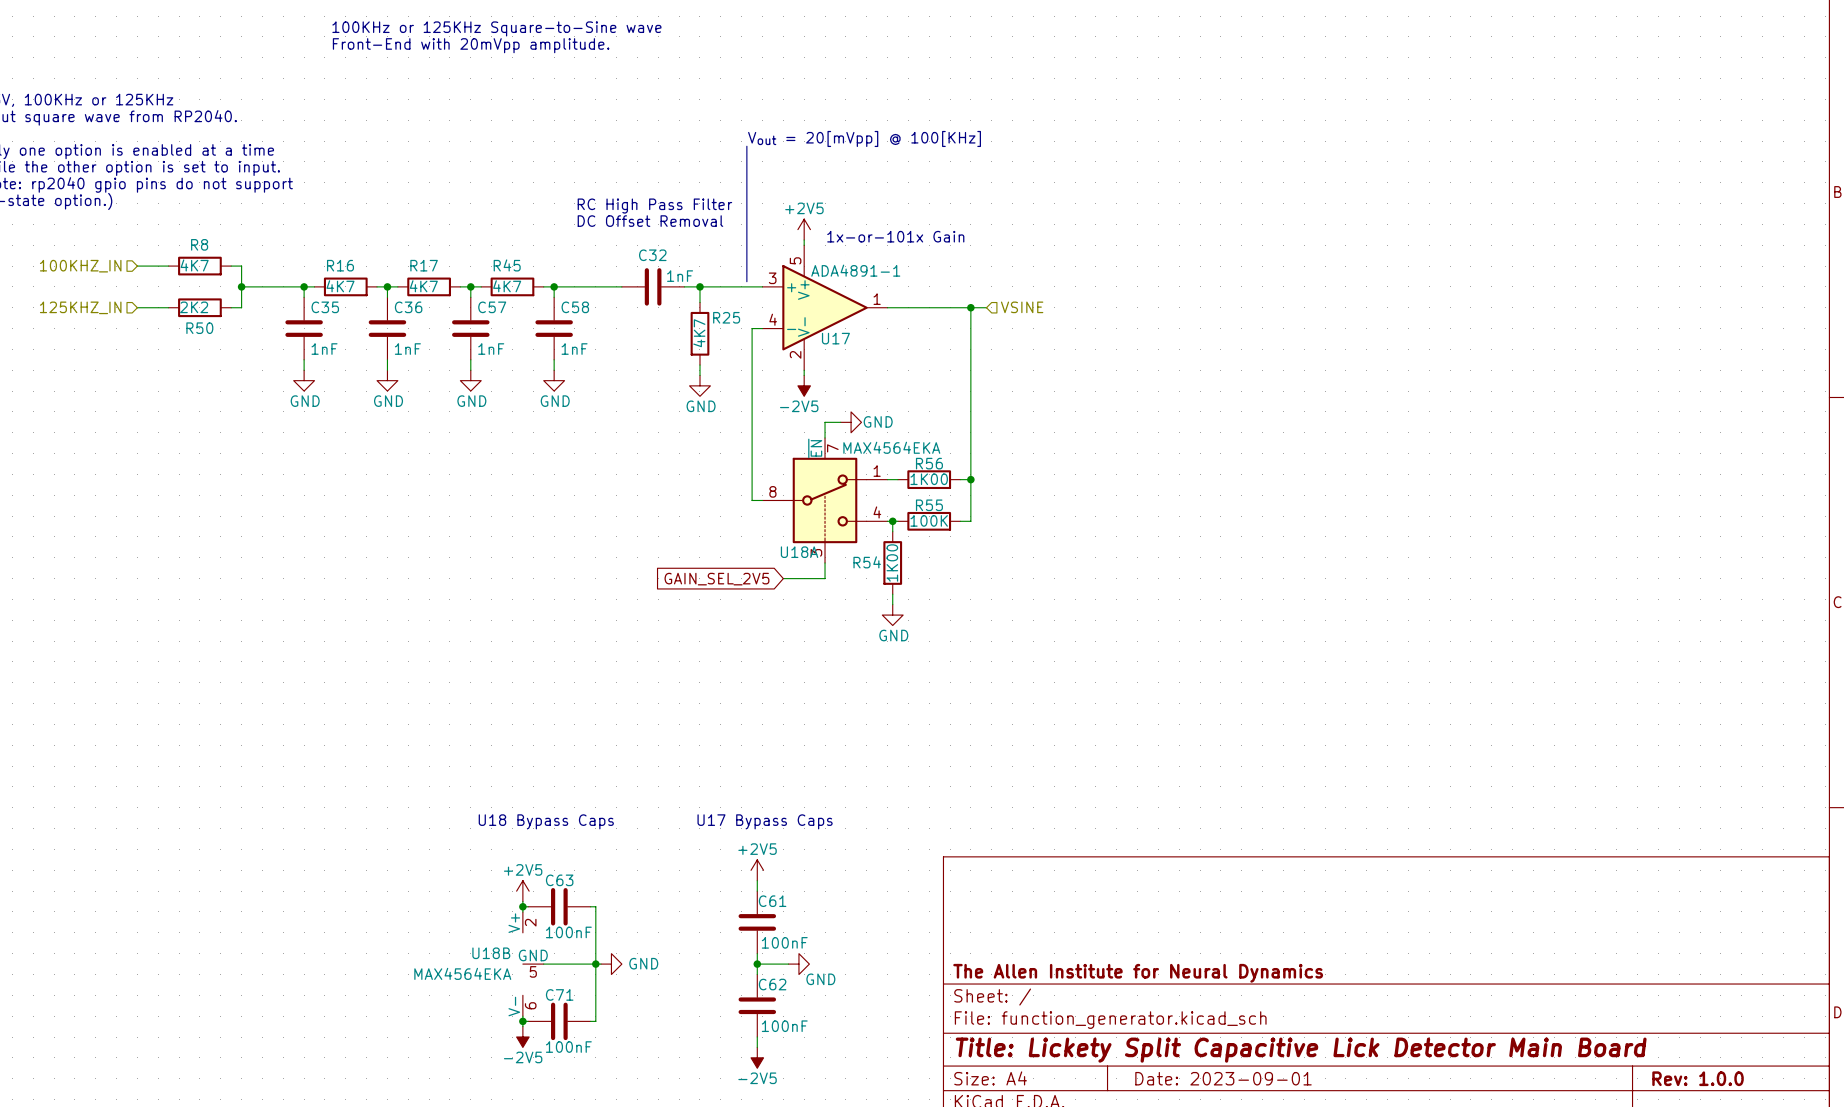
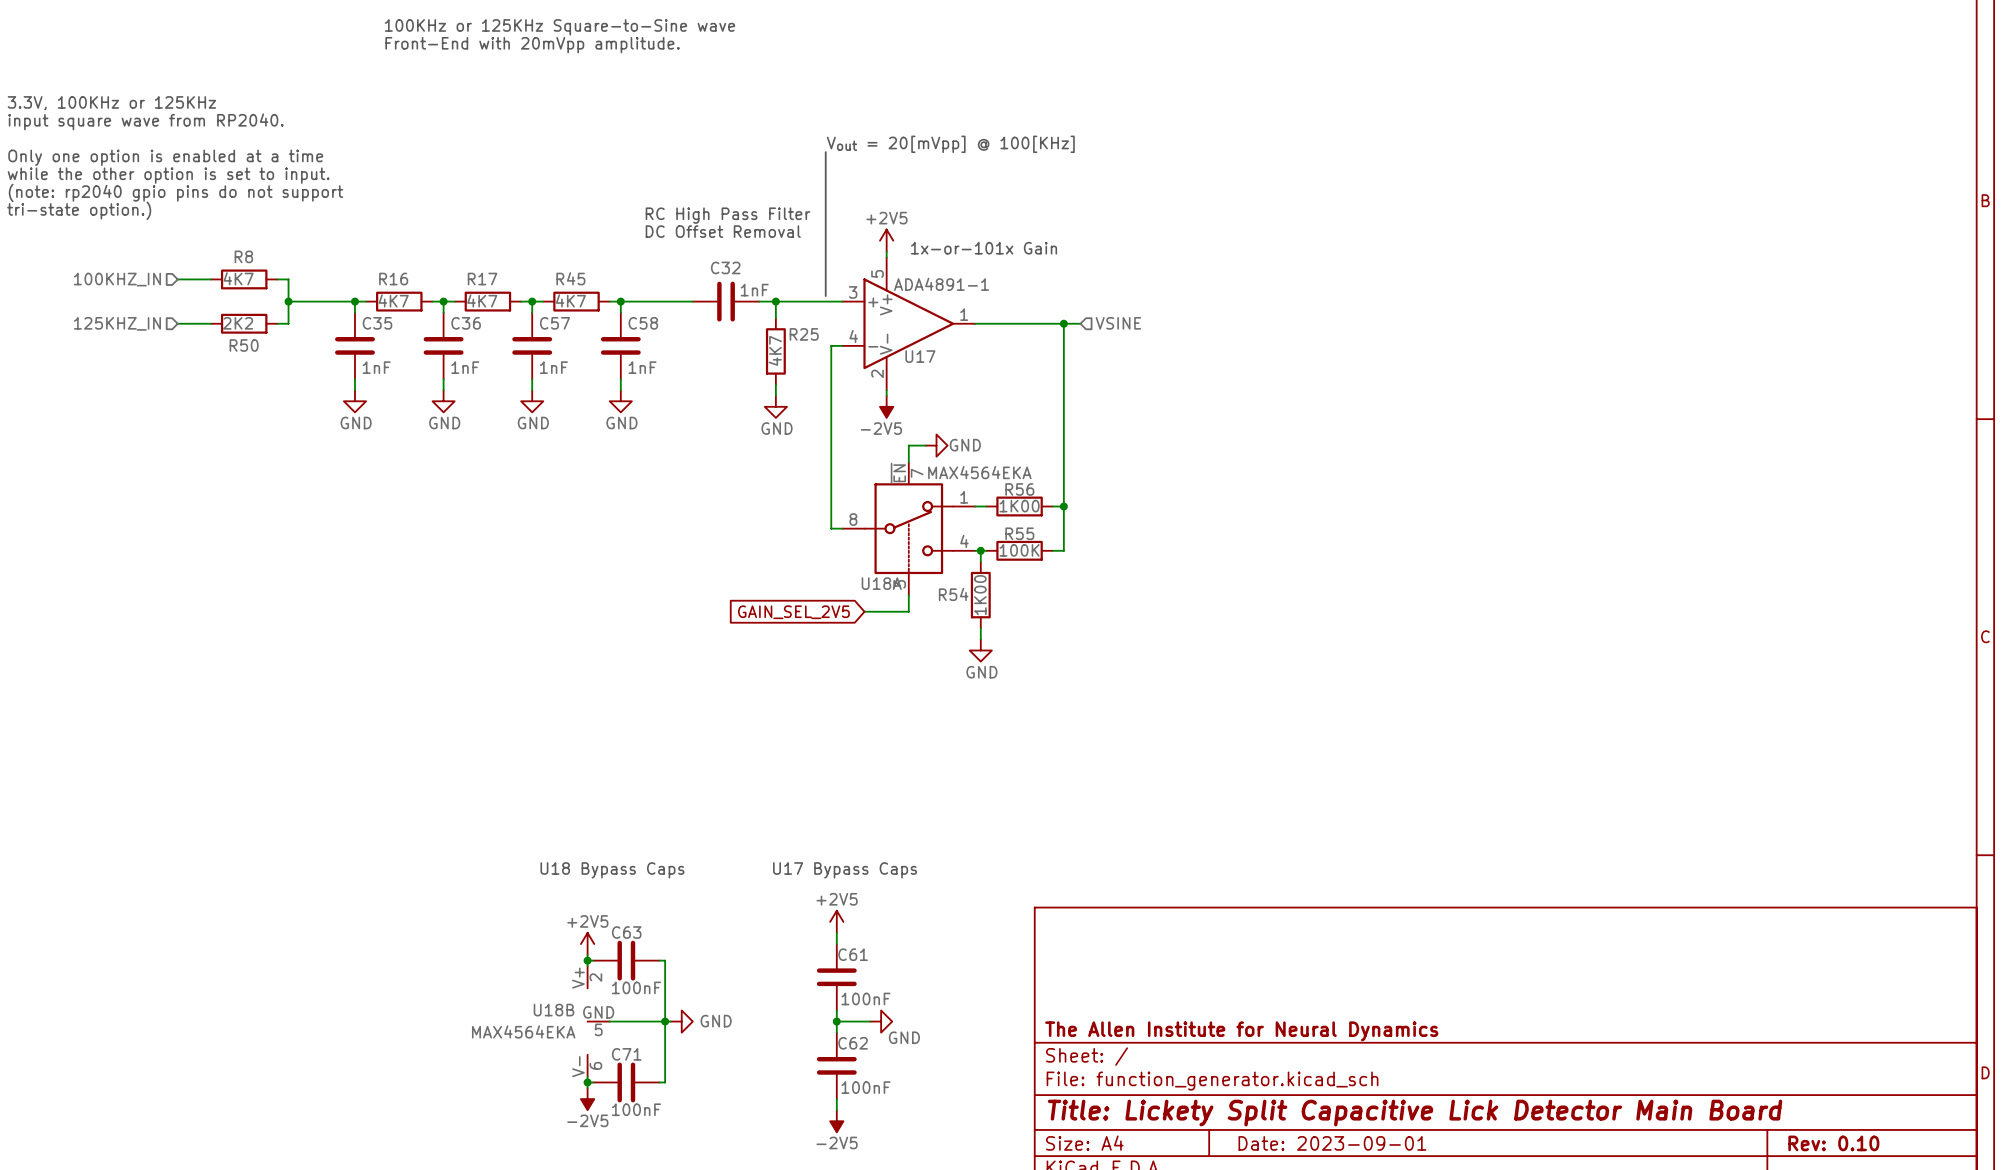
title block: Rev: 1.0.0 (1698, 1078) -> Rev: 0.10 (1833, 1143)

